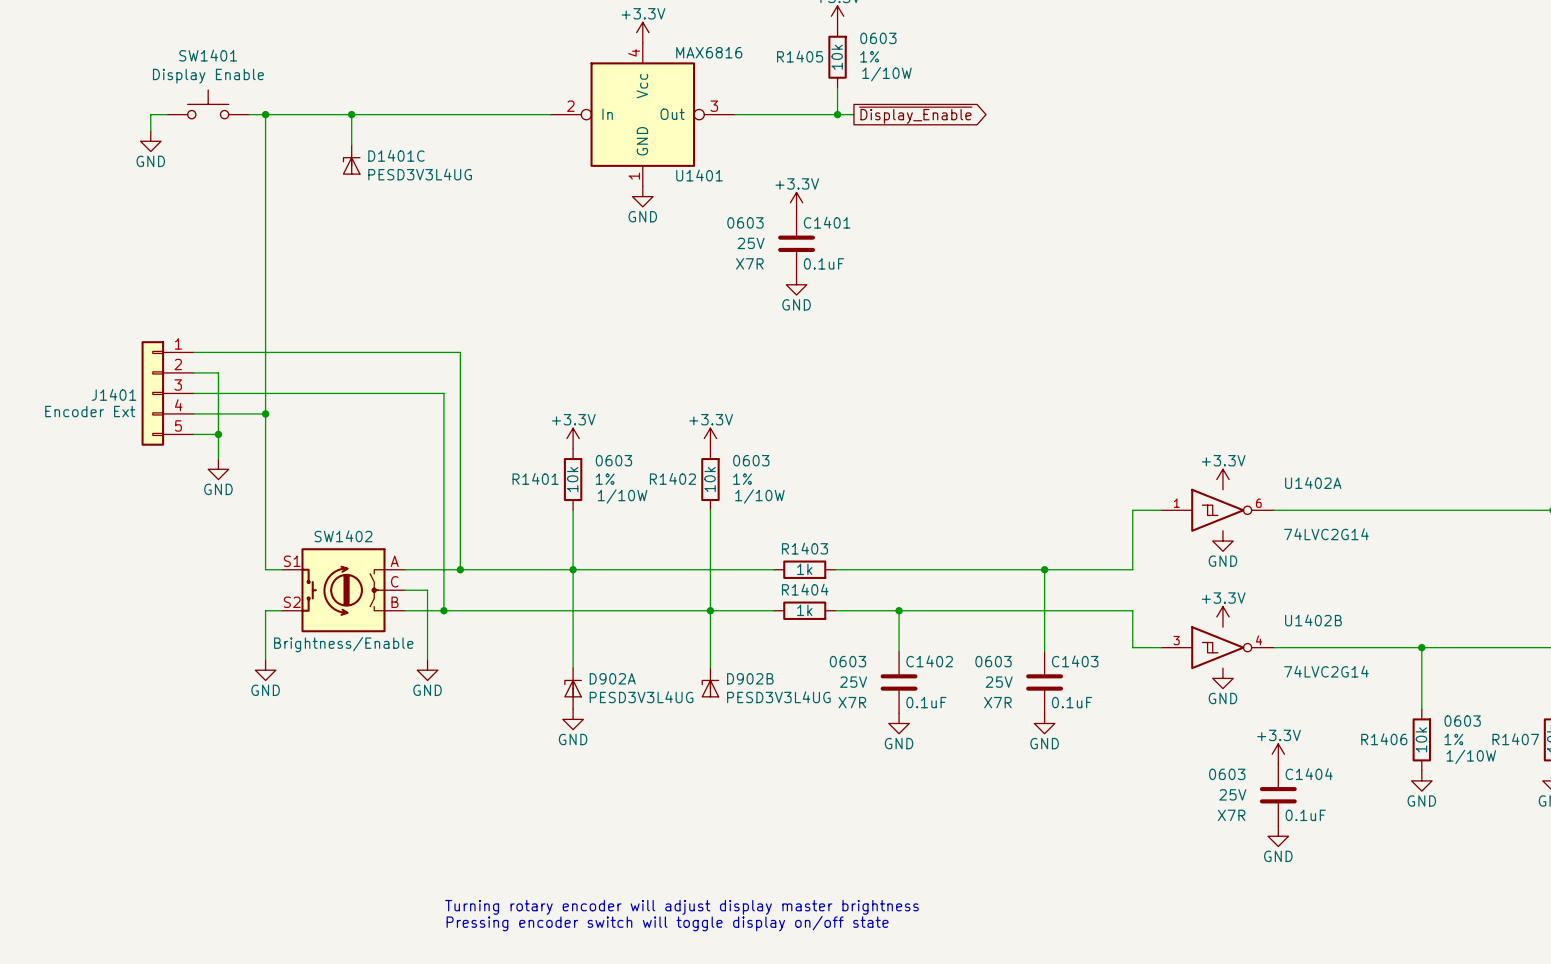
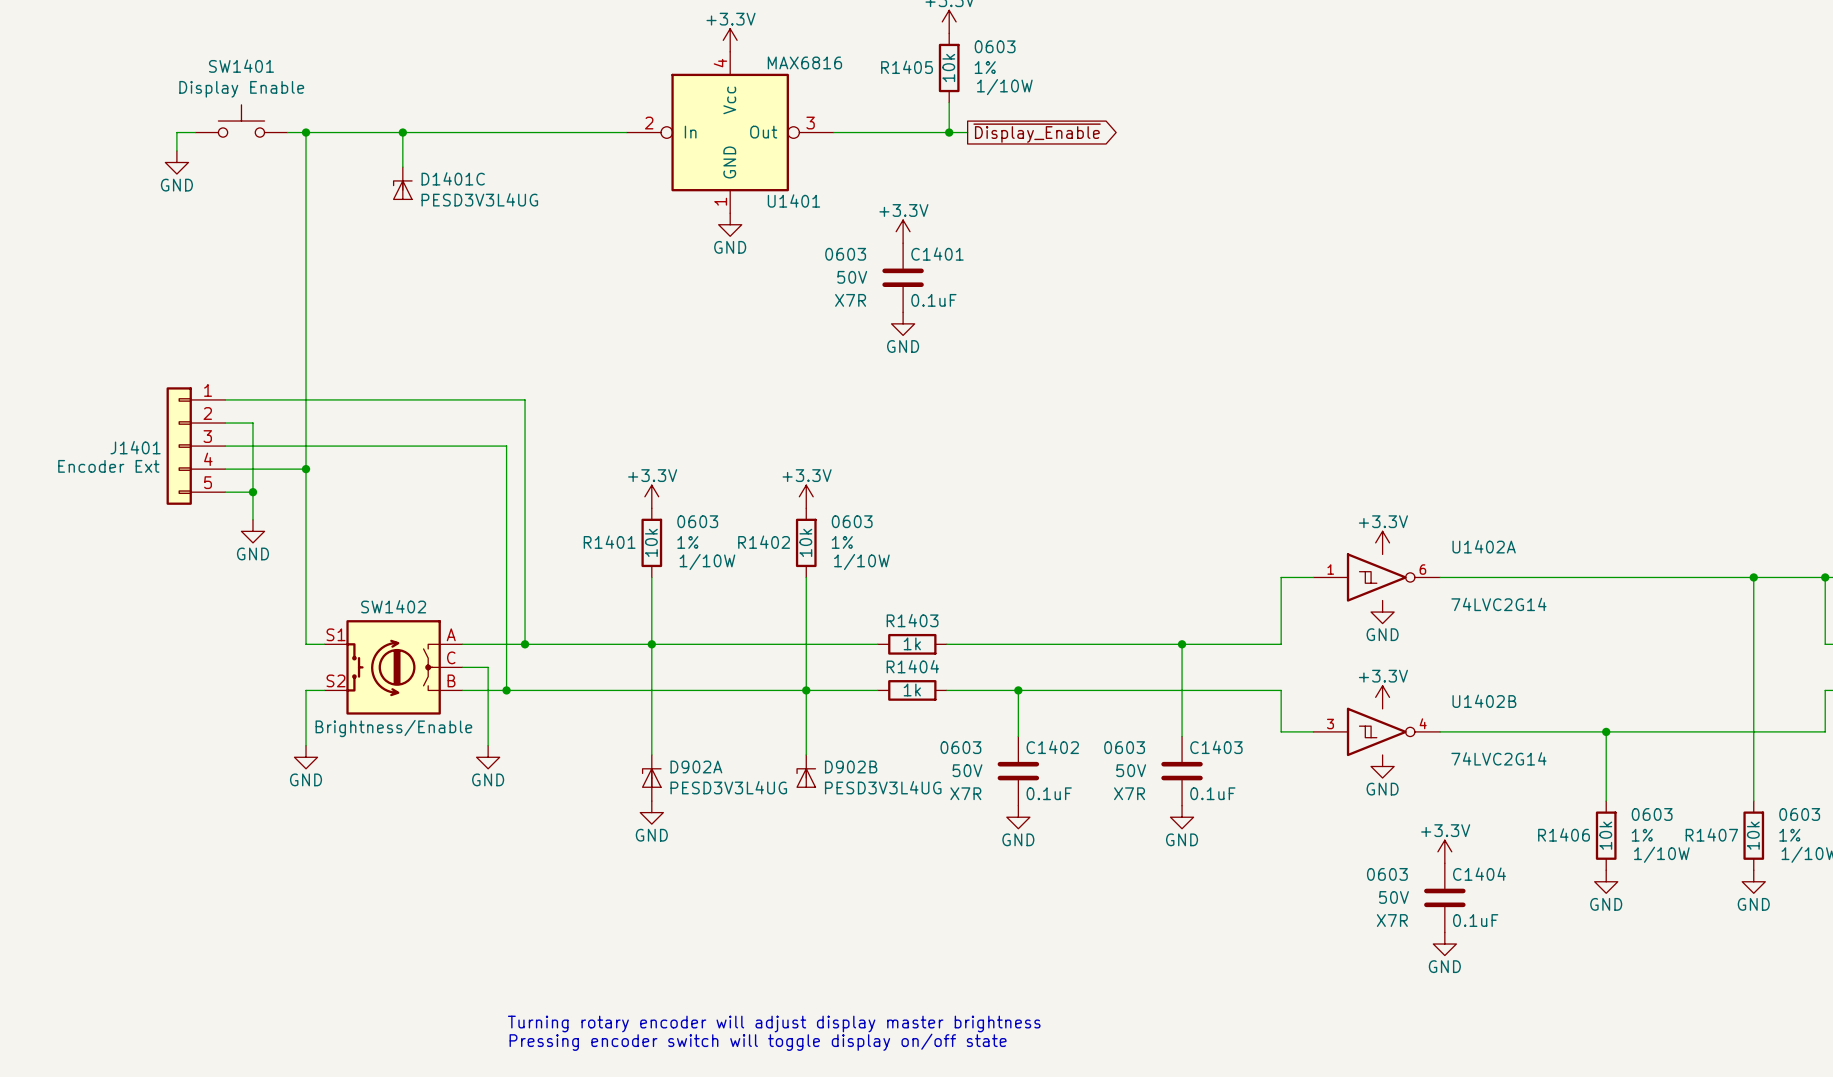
C1401 text: 25V (751, 243) -> 50V (852, 277)
C1402 text: 25V (853, 682) -> 50V (967, 770)
C1403 text: 25V (999, 682) -> 50V (1131, 770)
C1404 text: 25V (1232, 794) -> 50V (1393, 897)

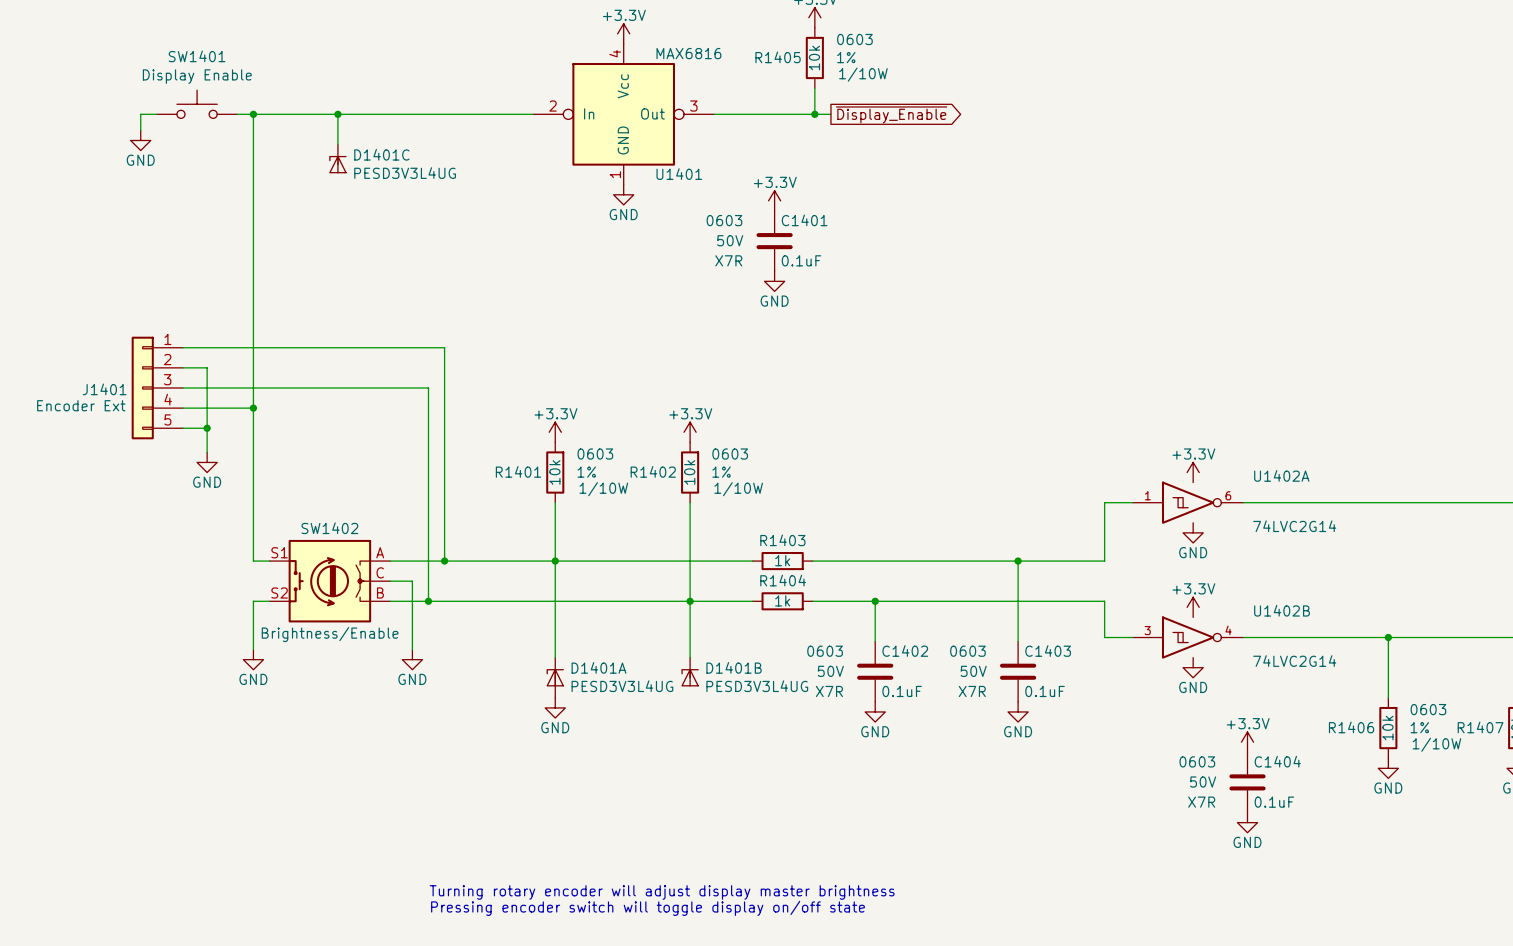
D902A name: D902A (696, 766) -> D1401A (598, 667)
D902B name: D902B (851, 766) -> D1401B (734, 667)

